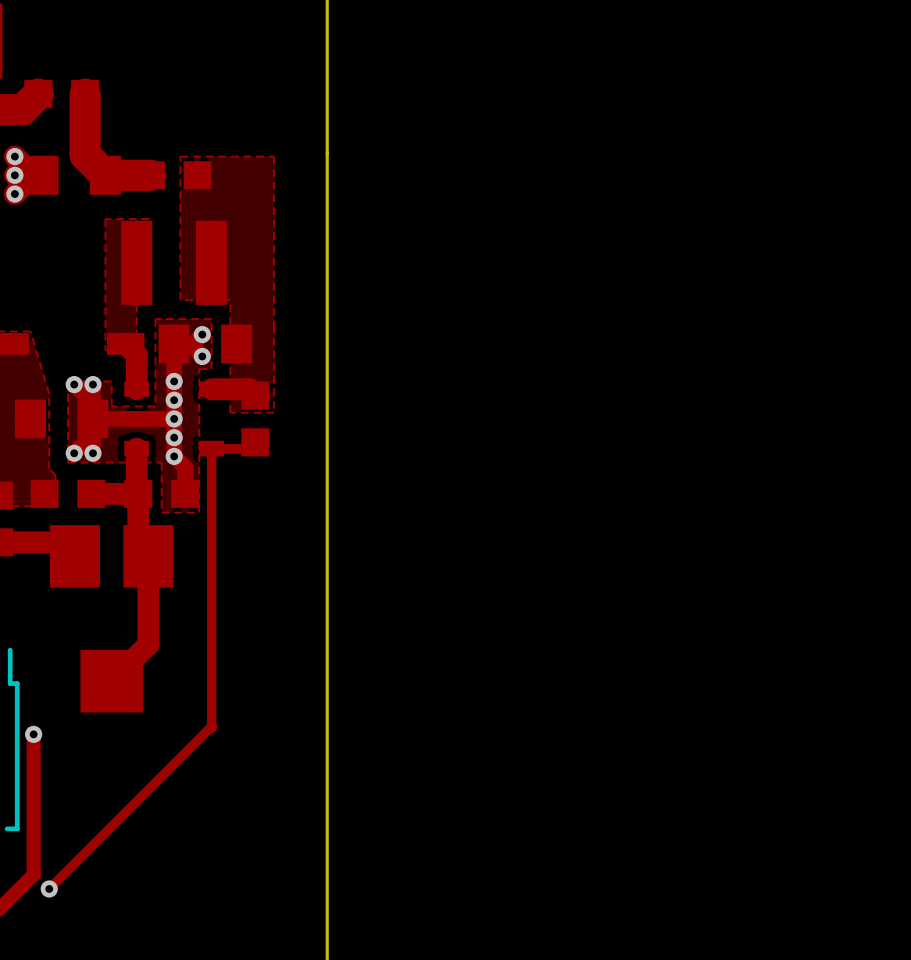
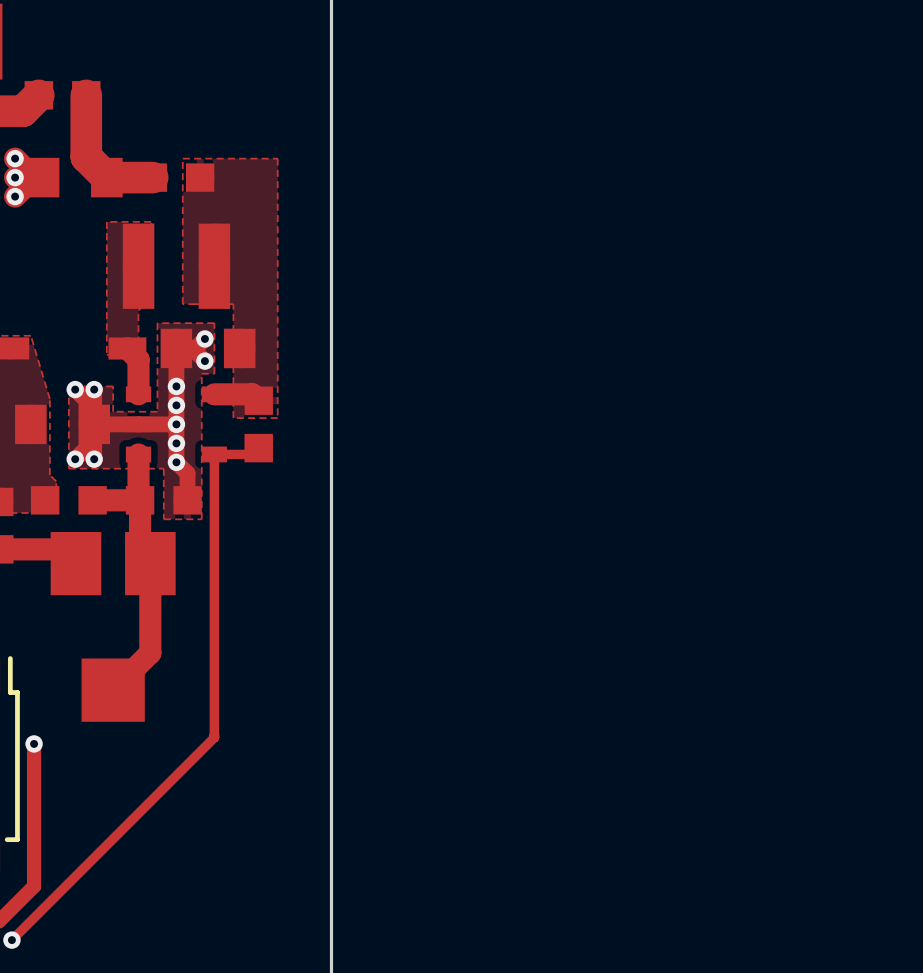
track: (211, 728) (49, 888) -> (214, 737) (11, 940)
via: (49, 888) -> none
via: none -> (11, 940)

